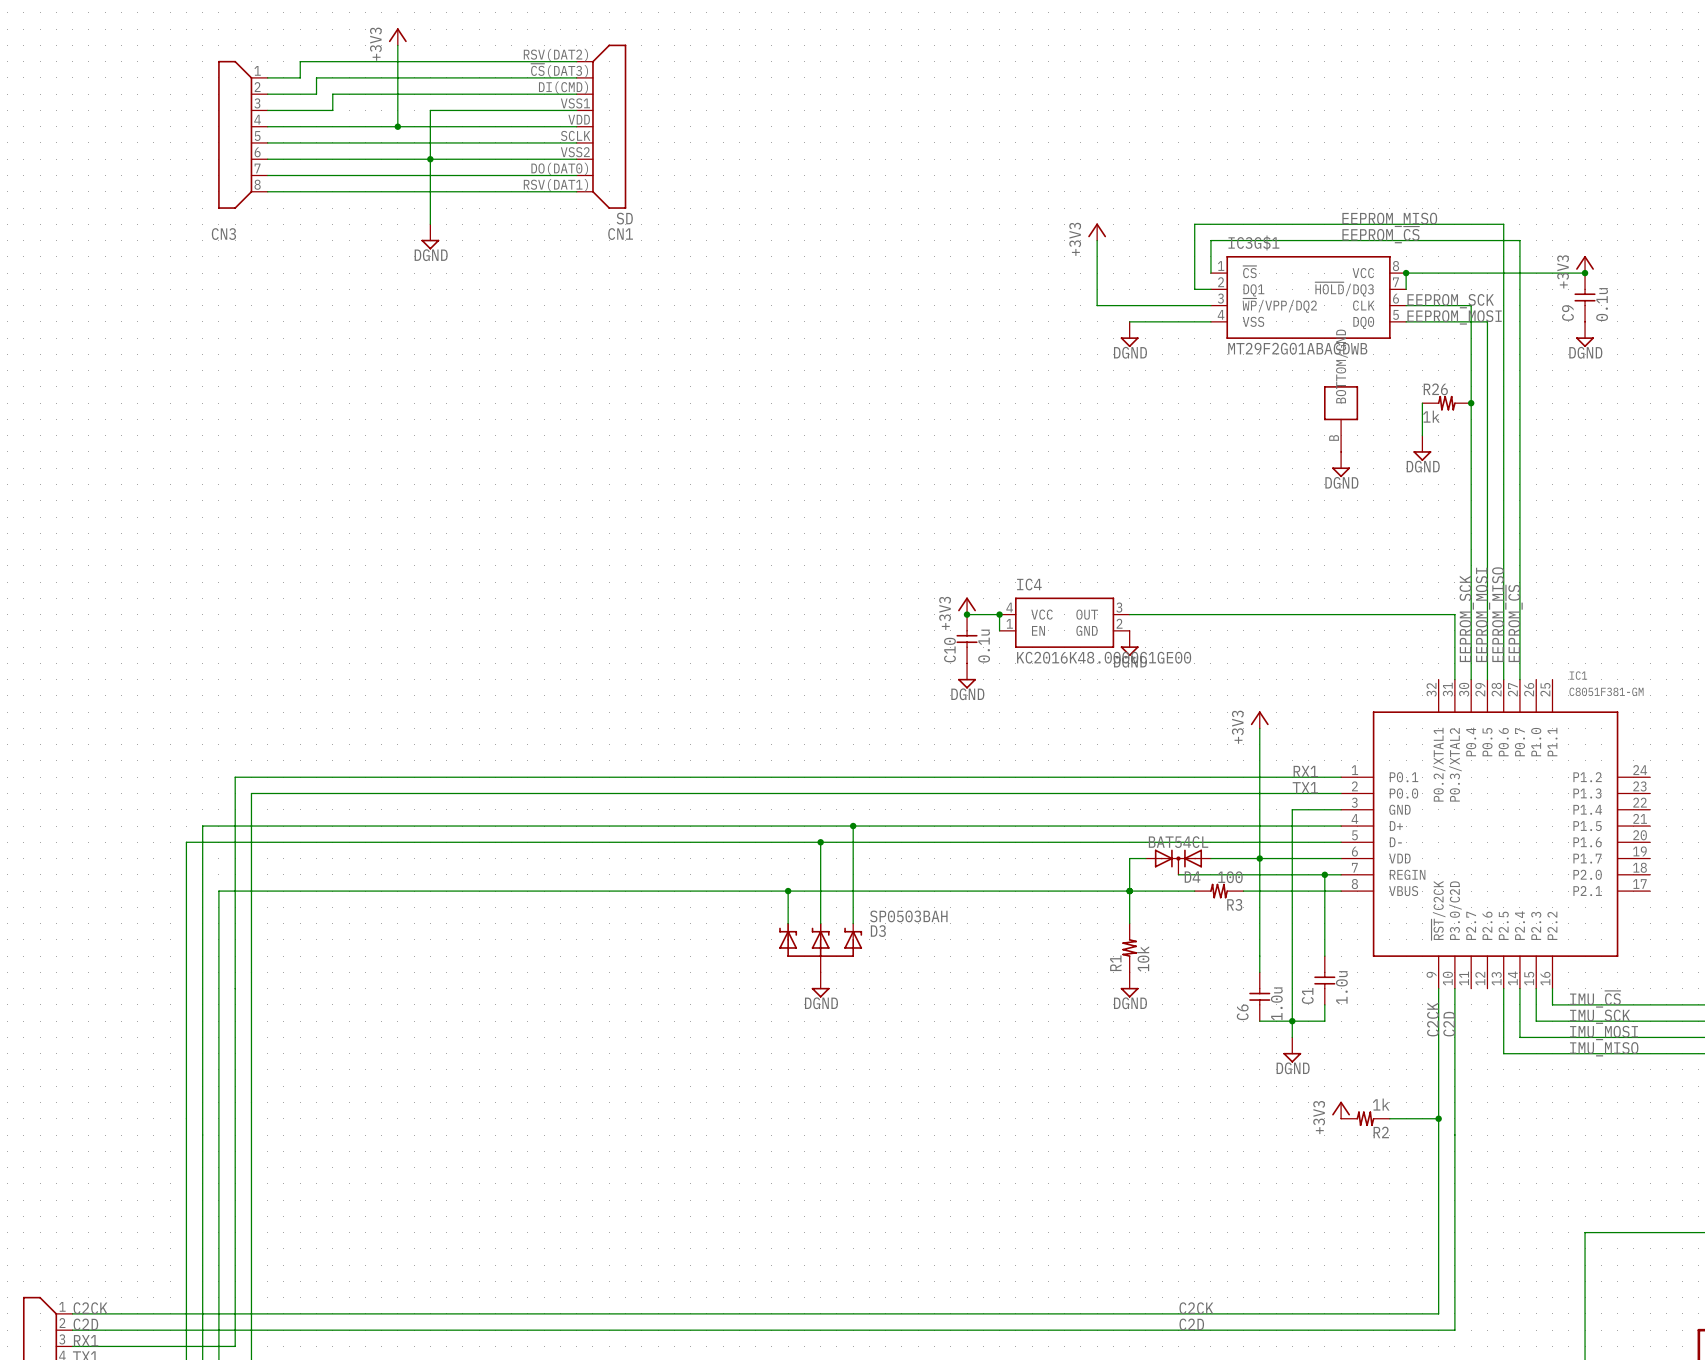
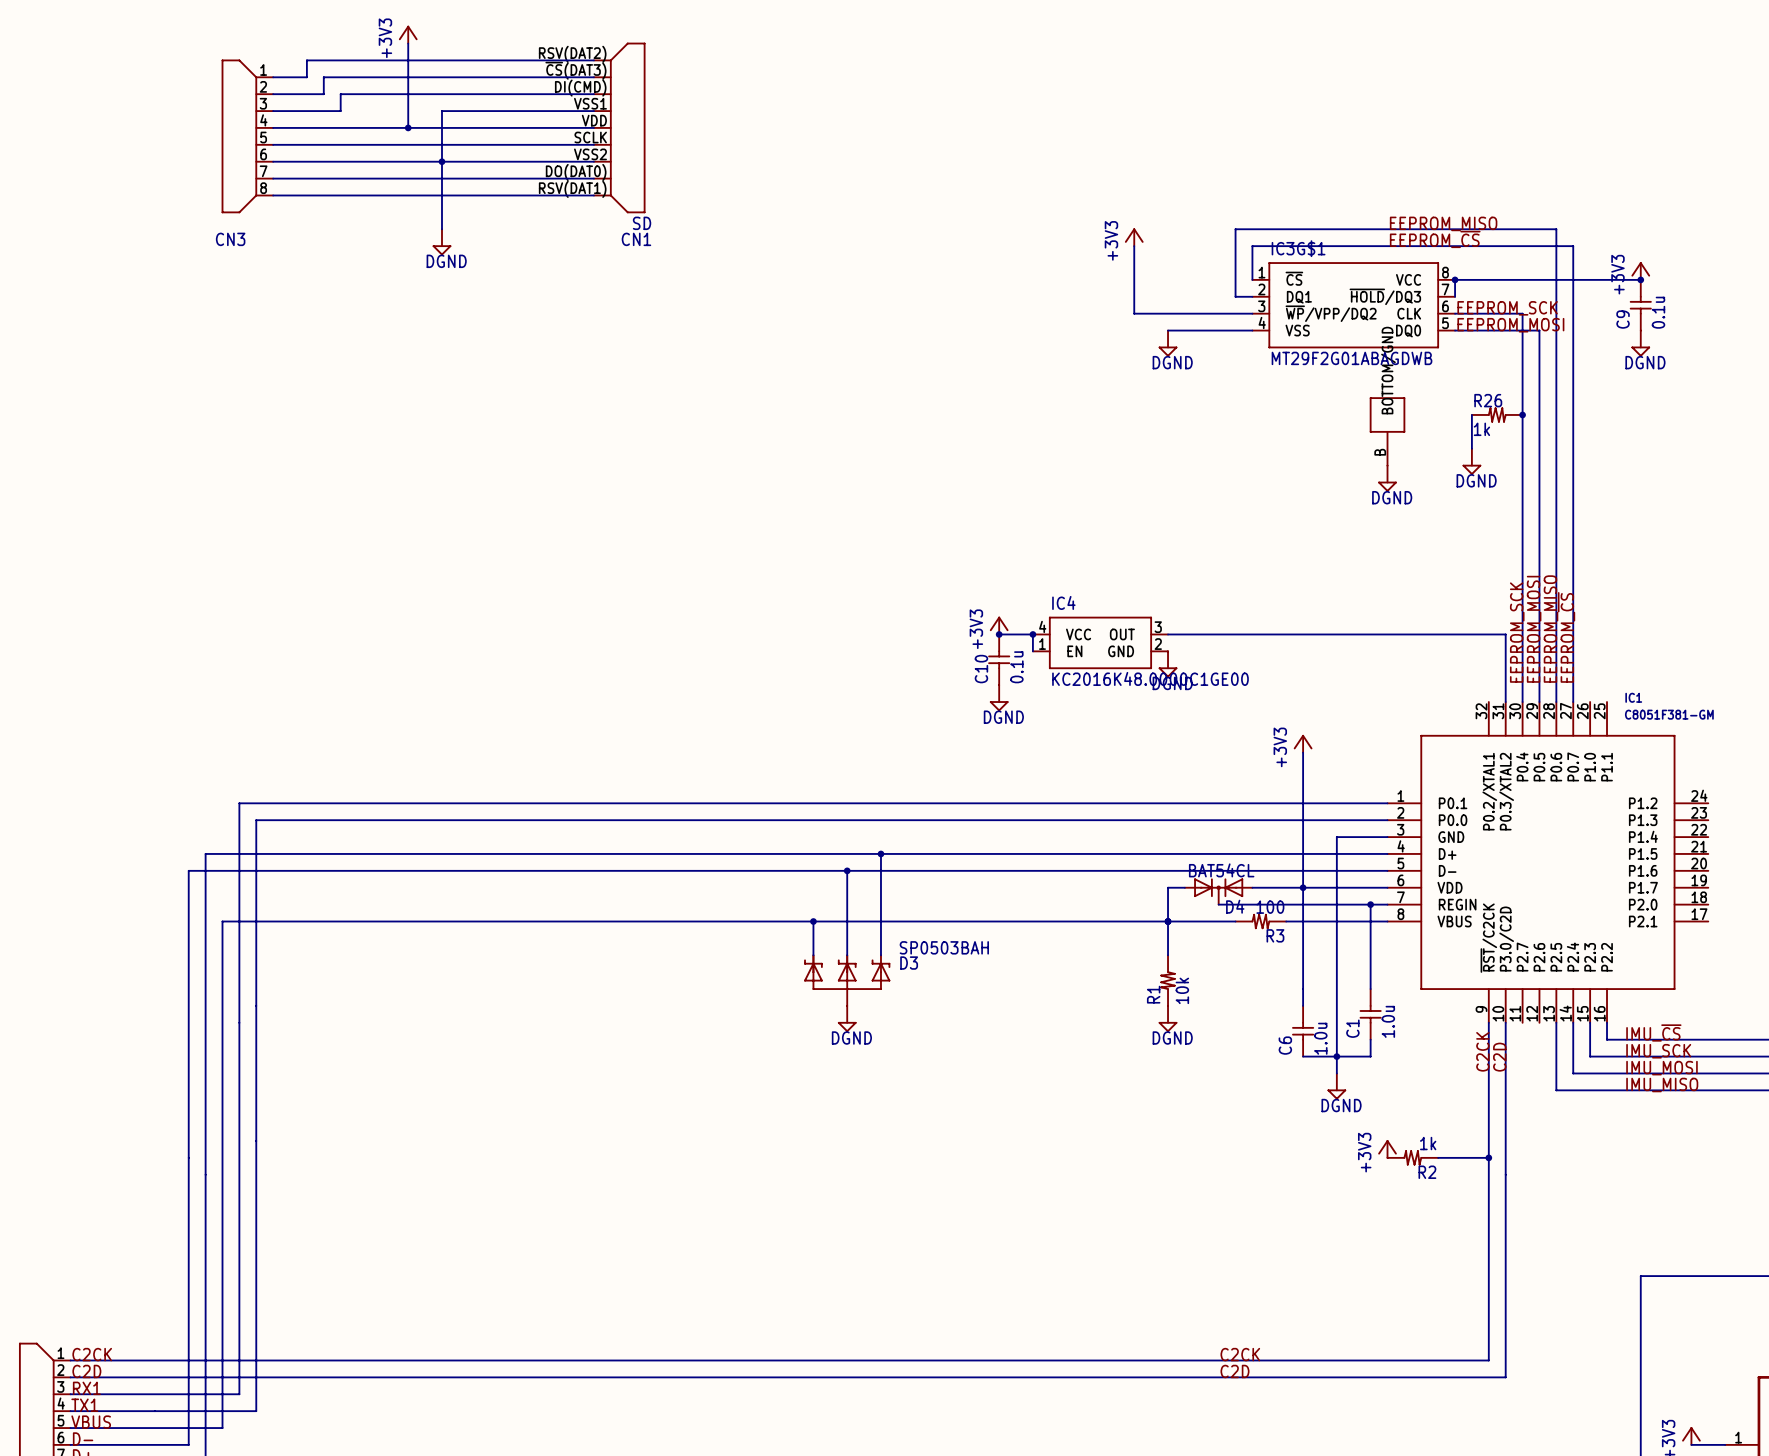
label: RX1 (1305, 771) -> none
label: TX1 (1305, 787) -> none

